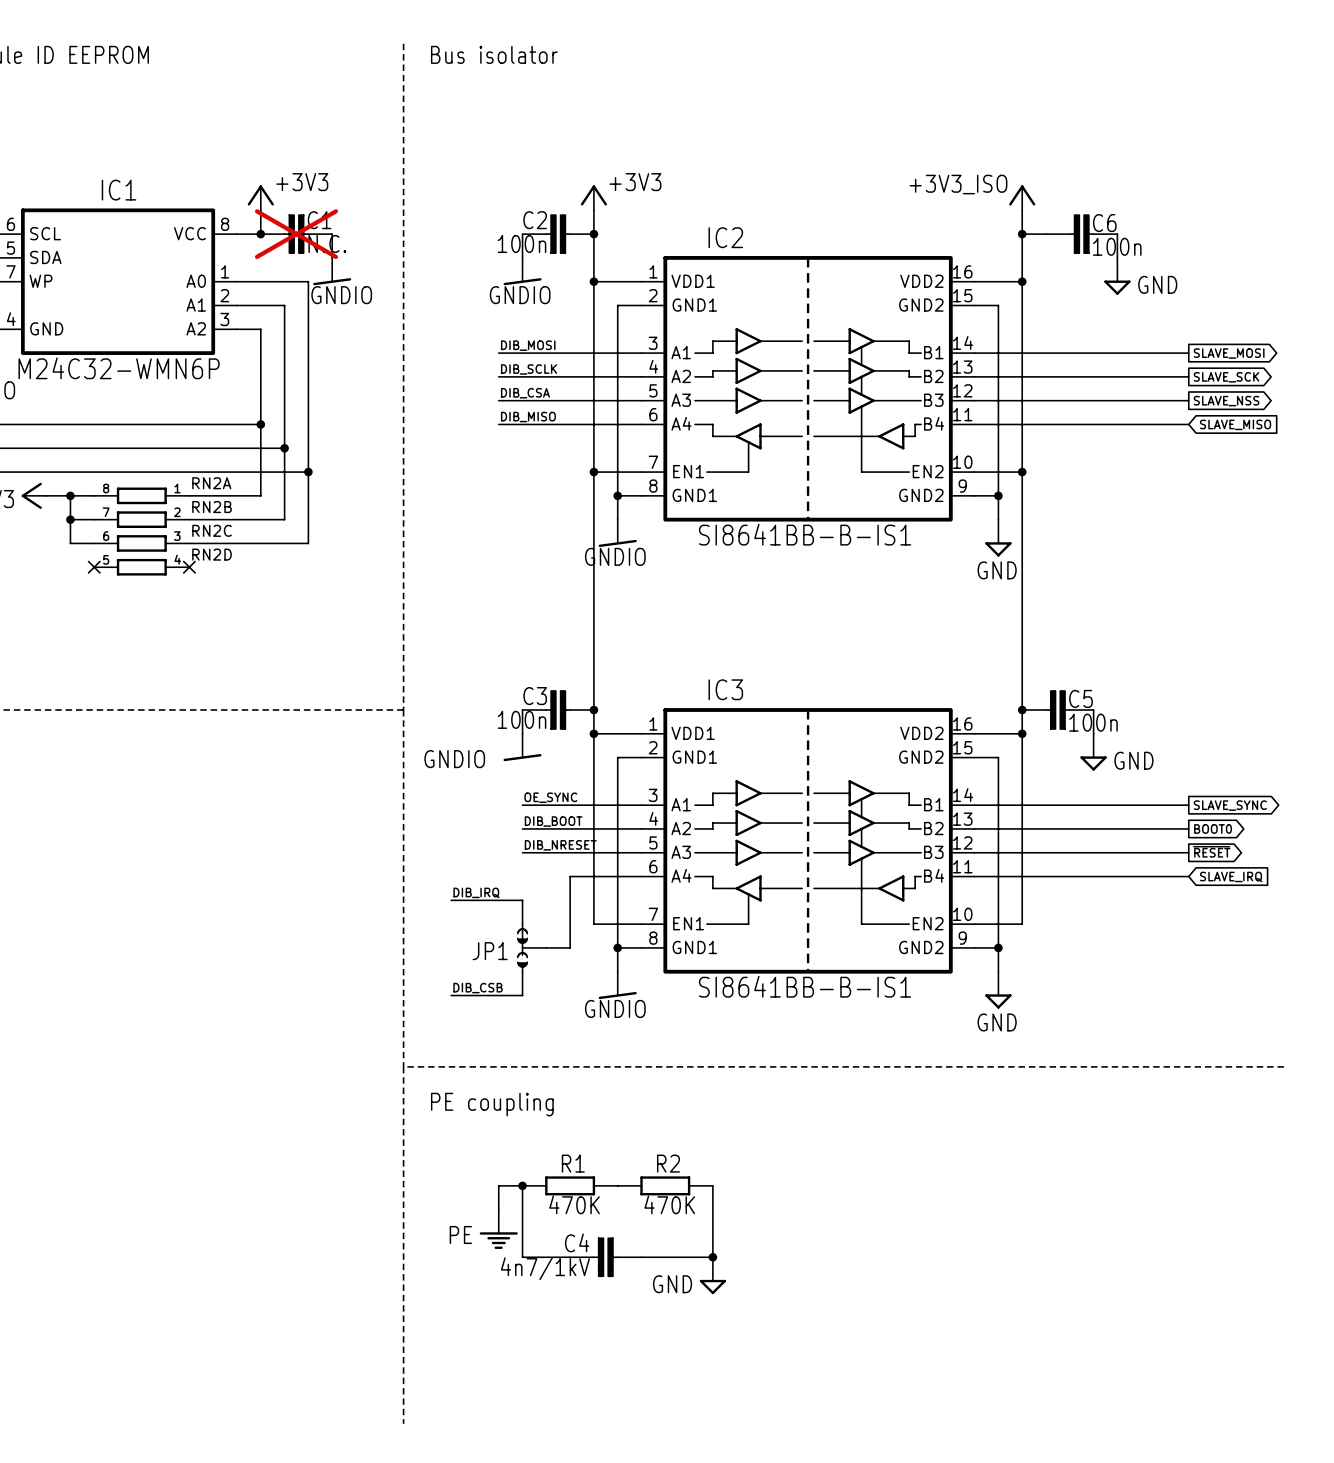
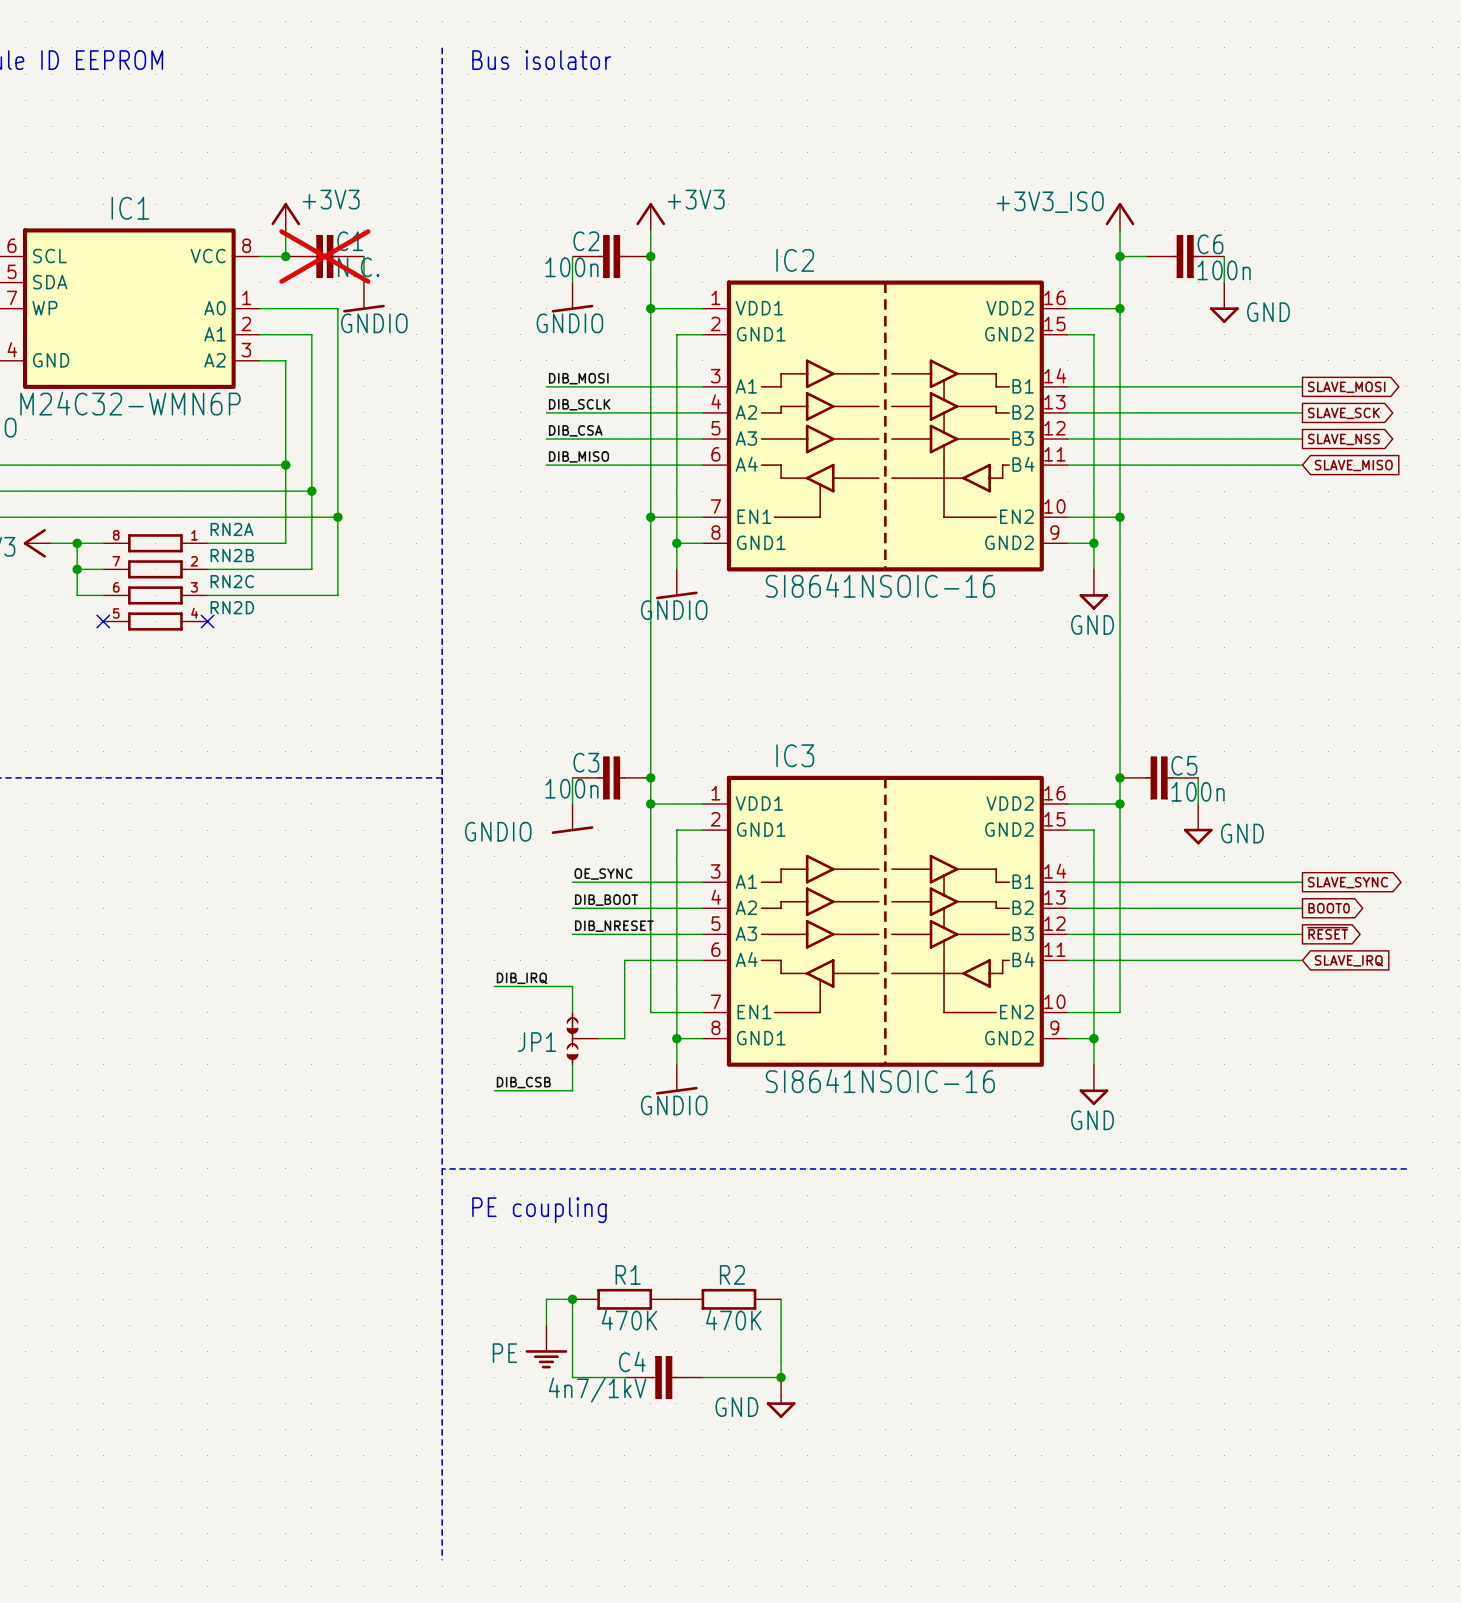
IC2 value: SI8641BB-B-IS1 (805, 534) -> SI8641NSOIC-16 (880, 585)
IC3 value: SI8641BB-B-IS1 (805, 986) -> SI8641NSOIC-16 (880, 1081)

